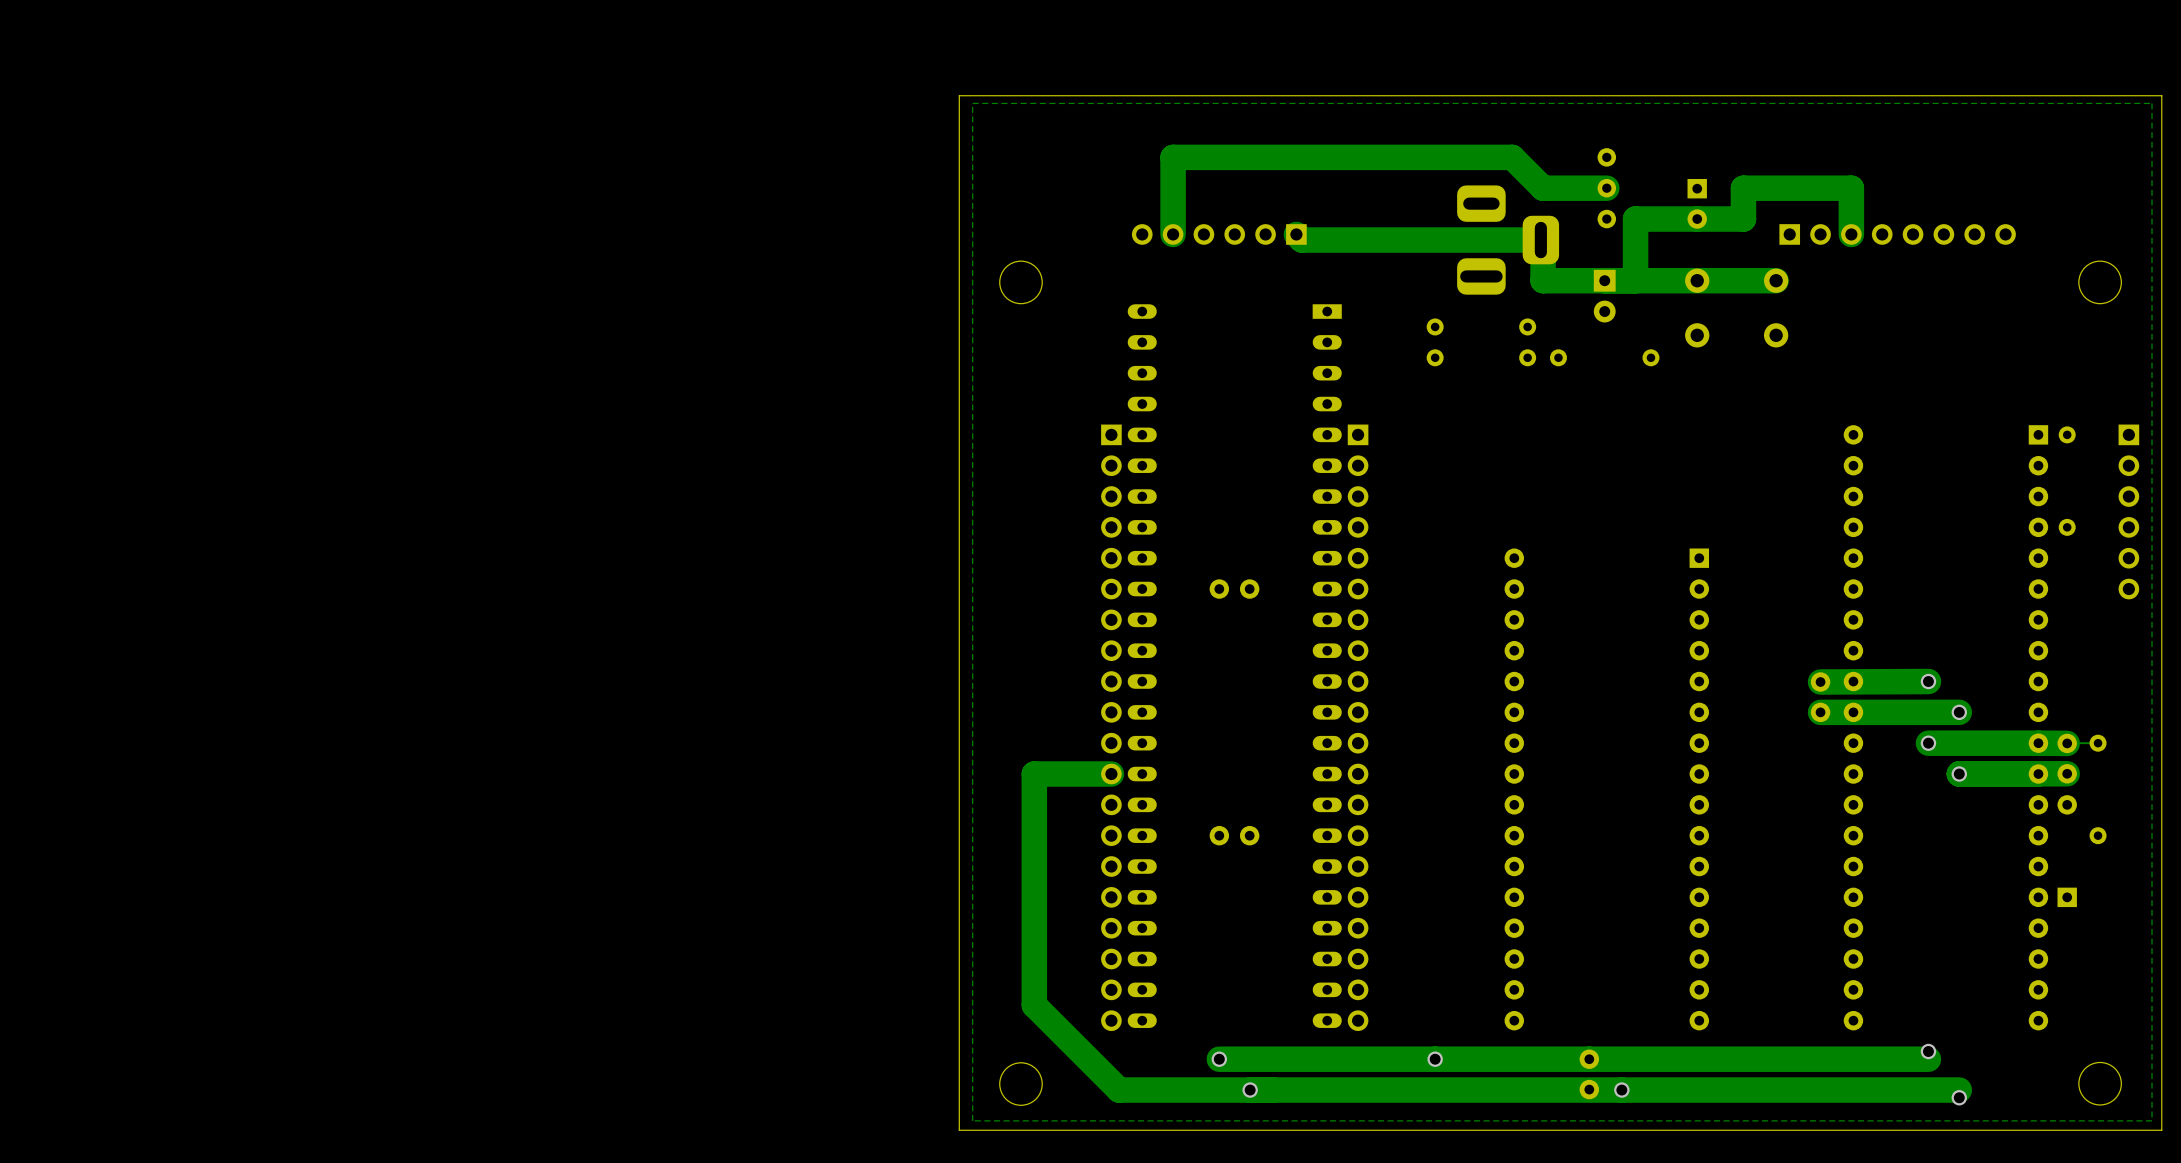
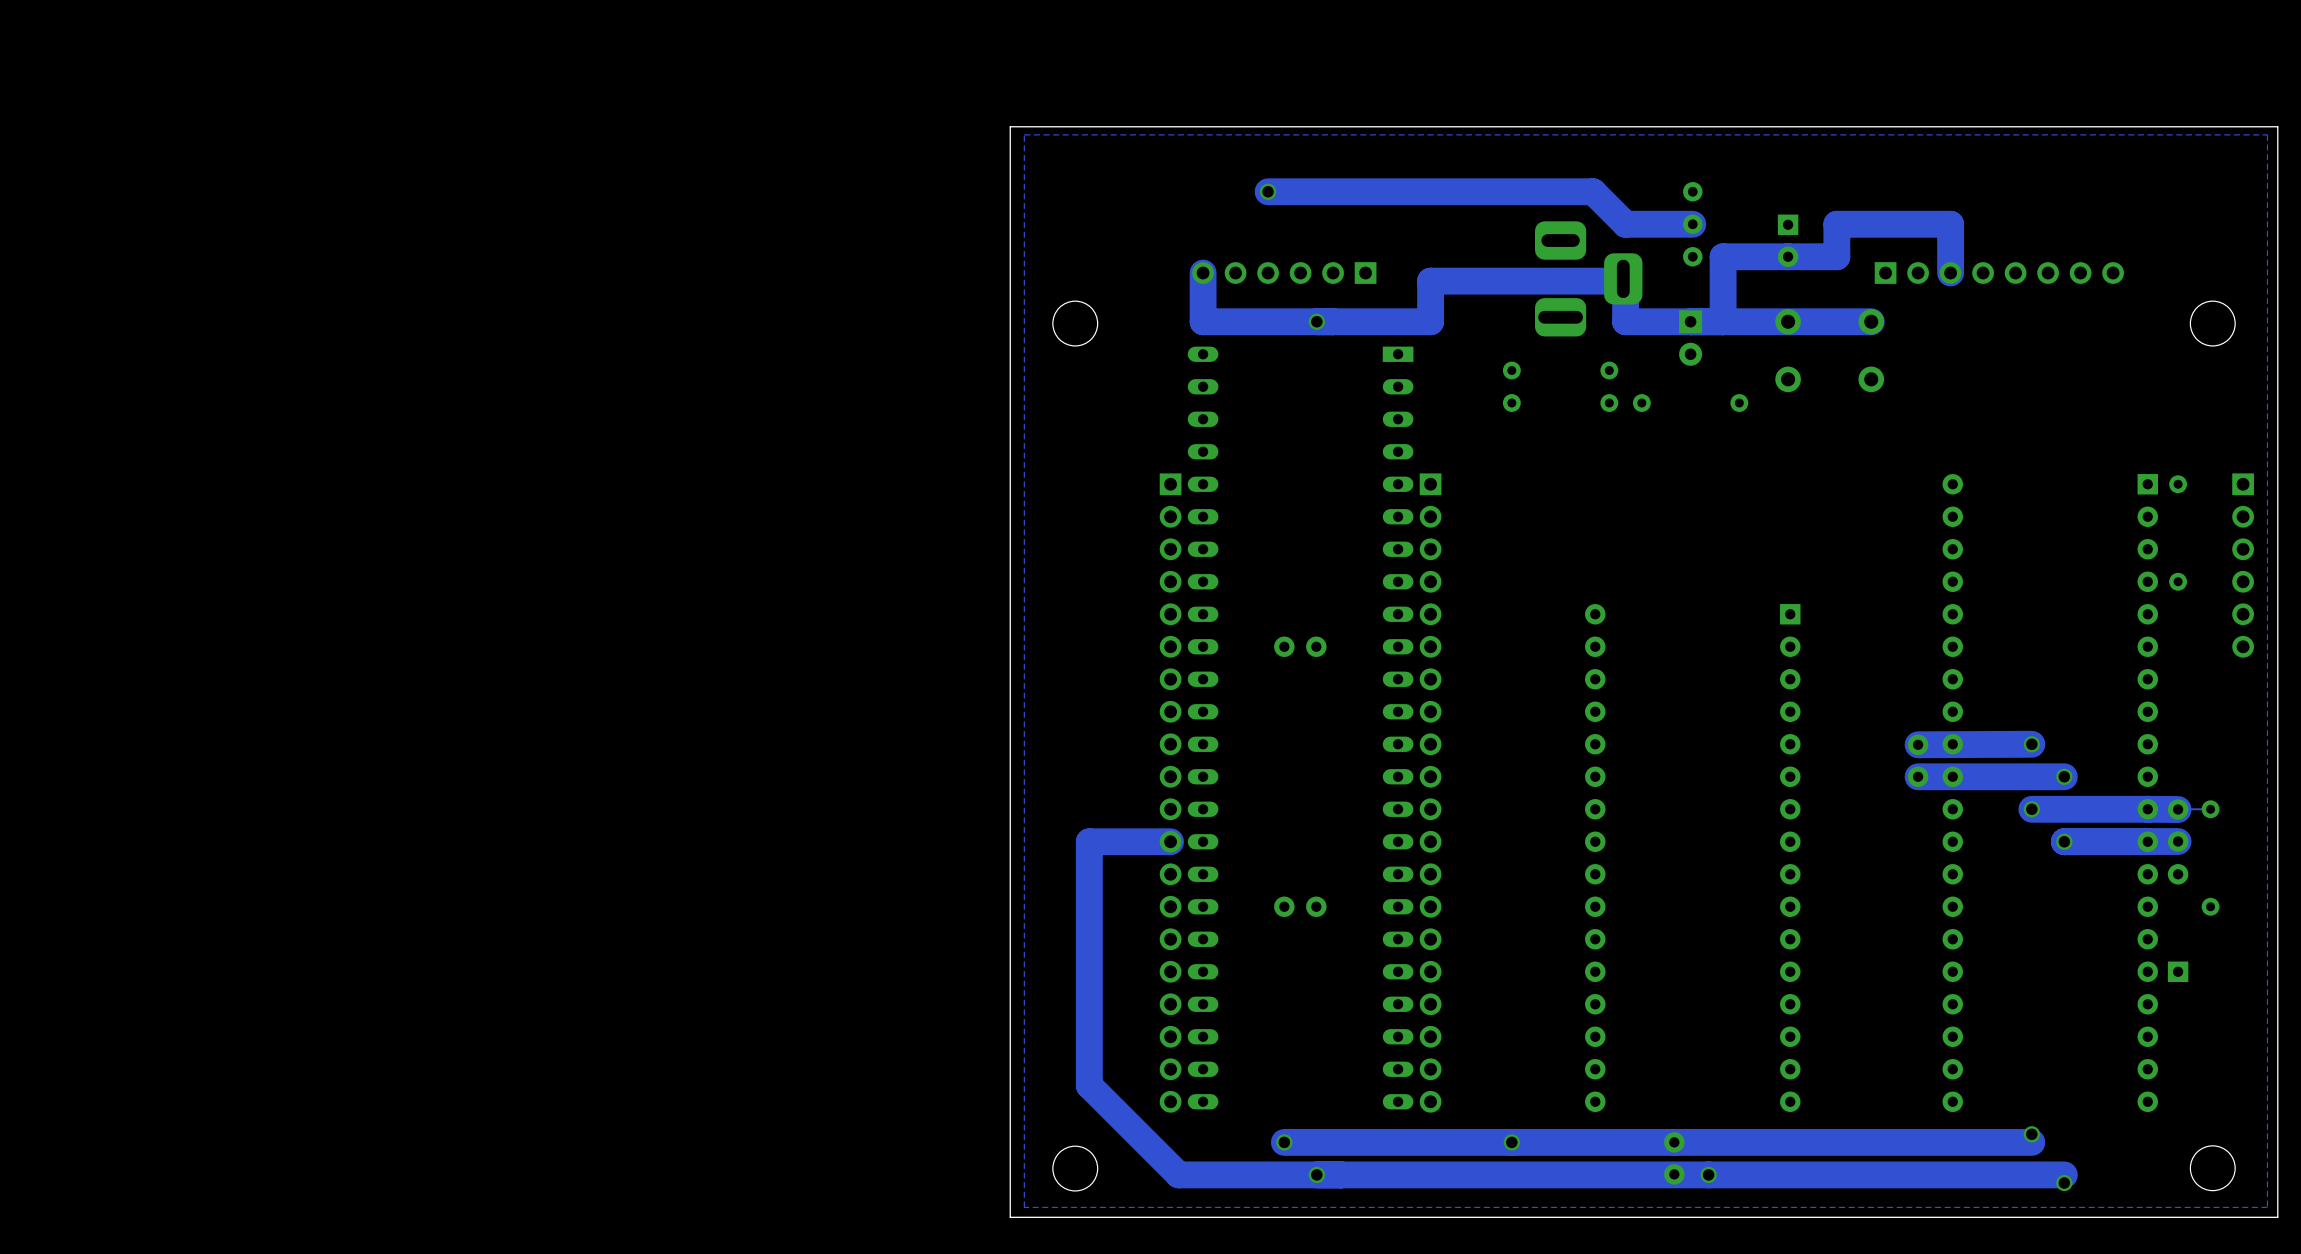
track: (1203, 157) (1173, 157) (1173, 234) -> none
via: none -> (1268, 191)
track: (1296, 234) (1301, 240) (1540, 240) -> (1203, 273) (1203, 321) (1430, 321) (1430, 281) (1621, 281) (1623, 278)
via: none -> (1316, 321)

